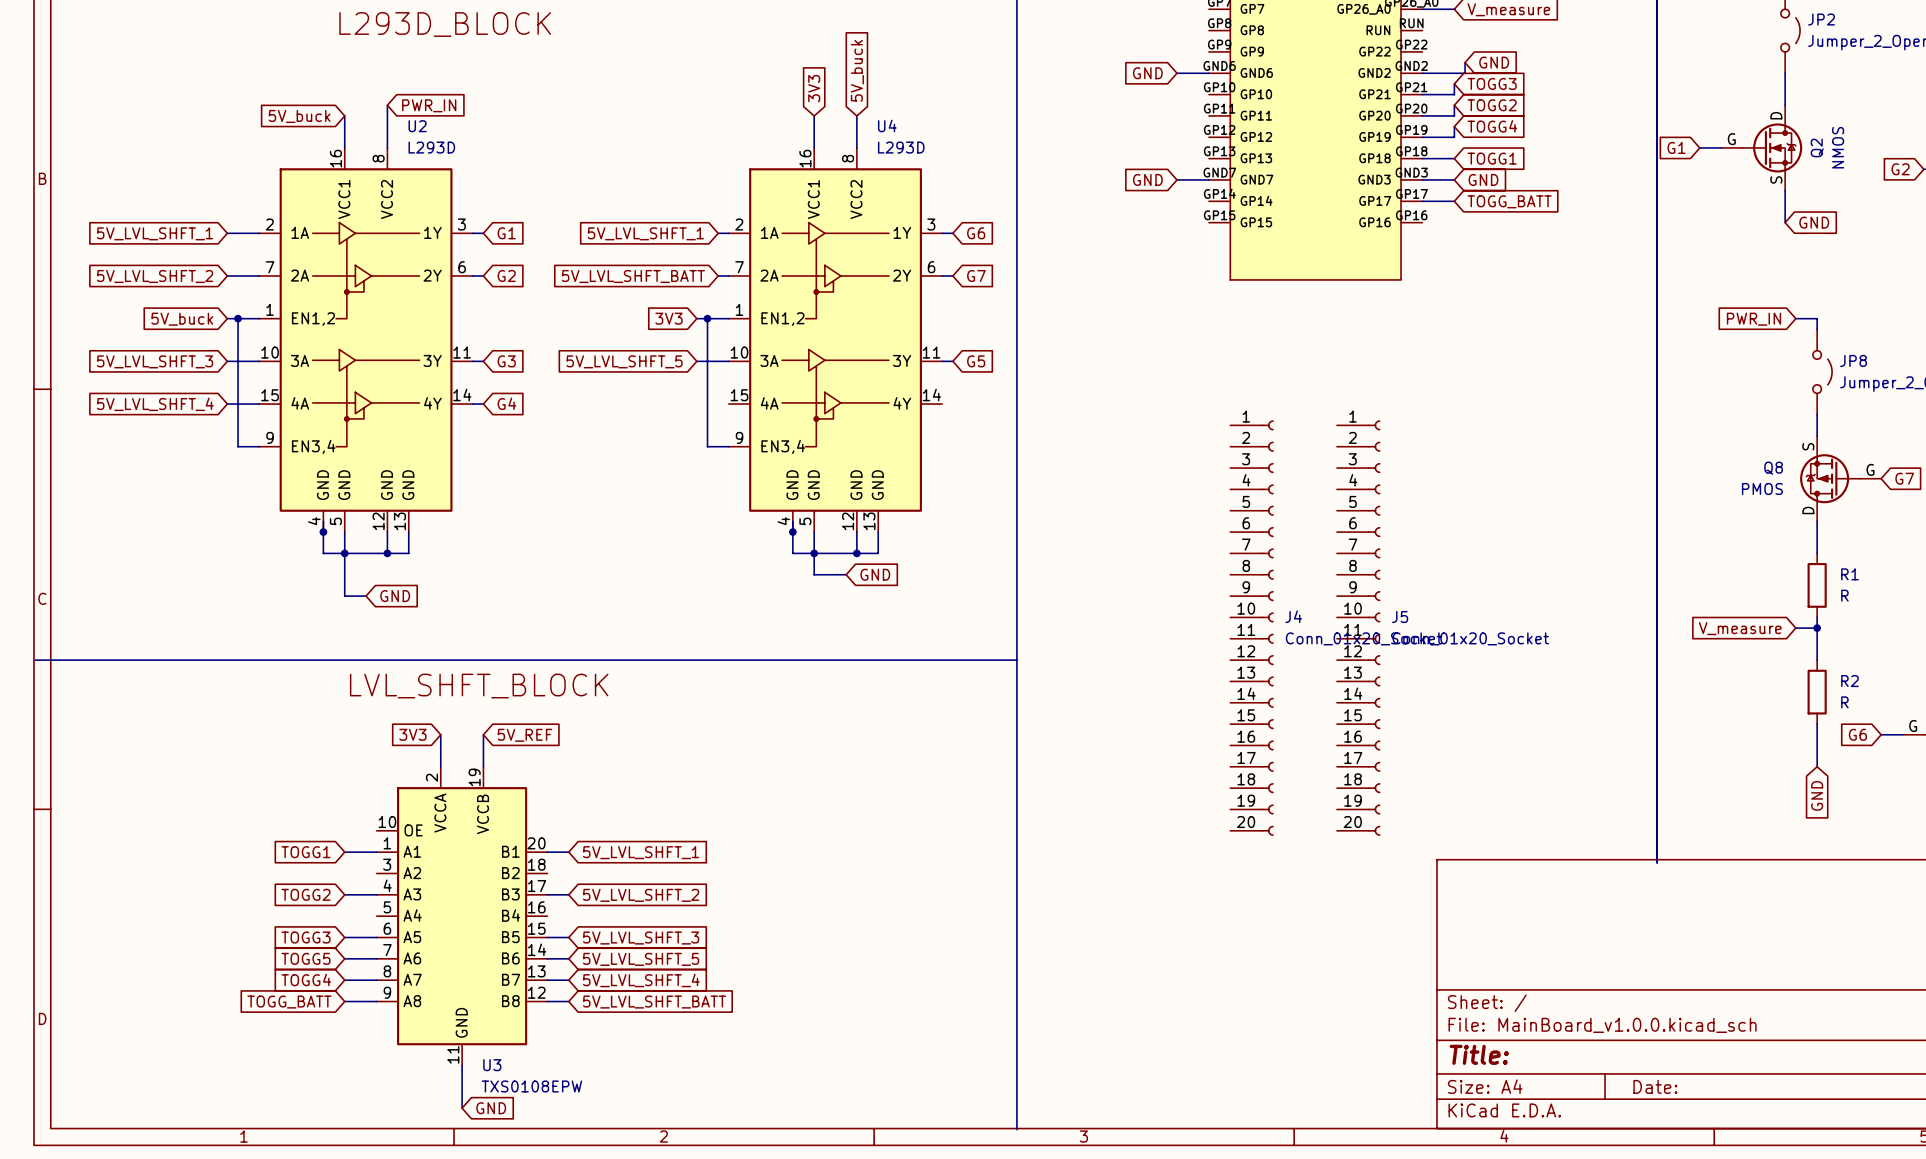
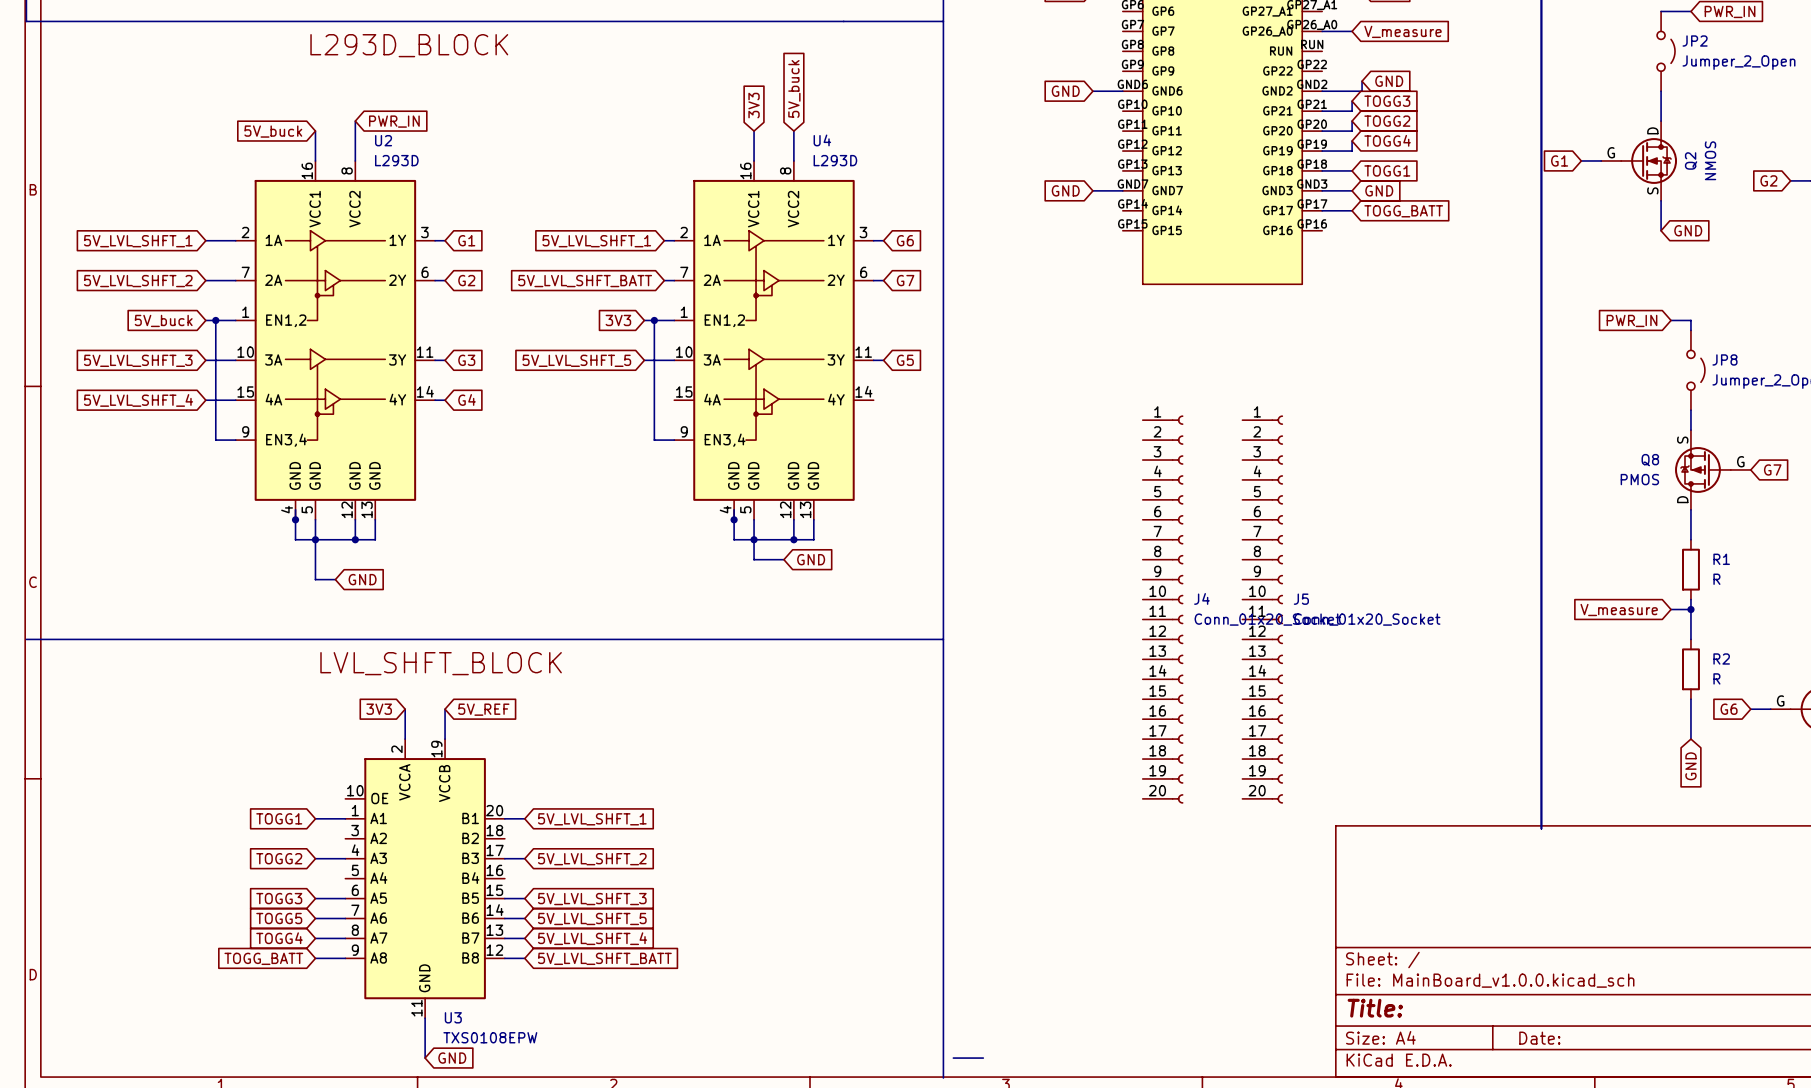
wire: none -> (953, 1058) (983, 1058)

